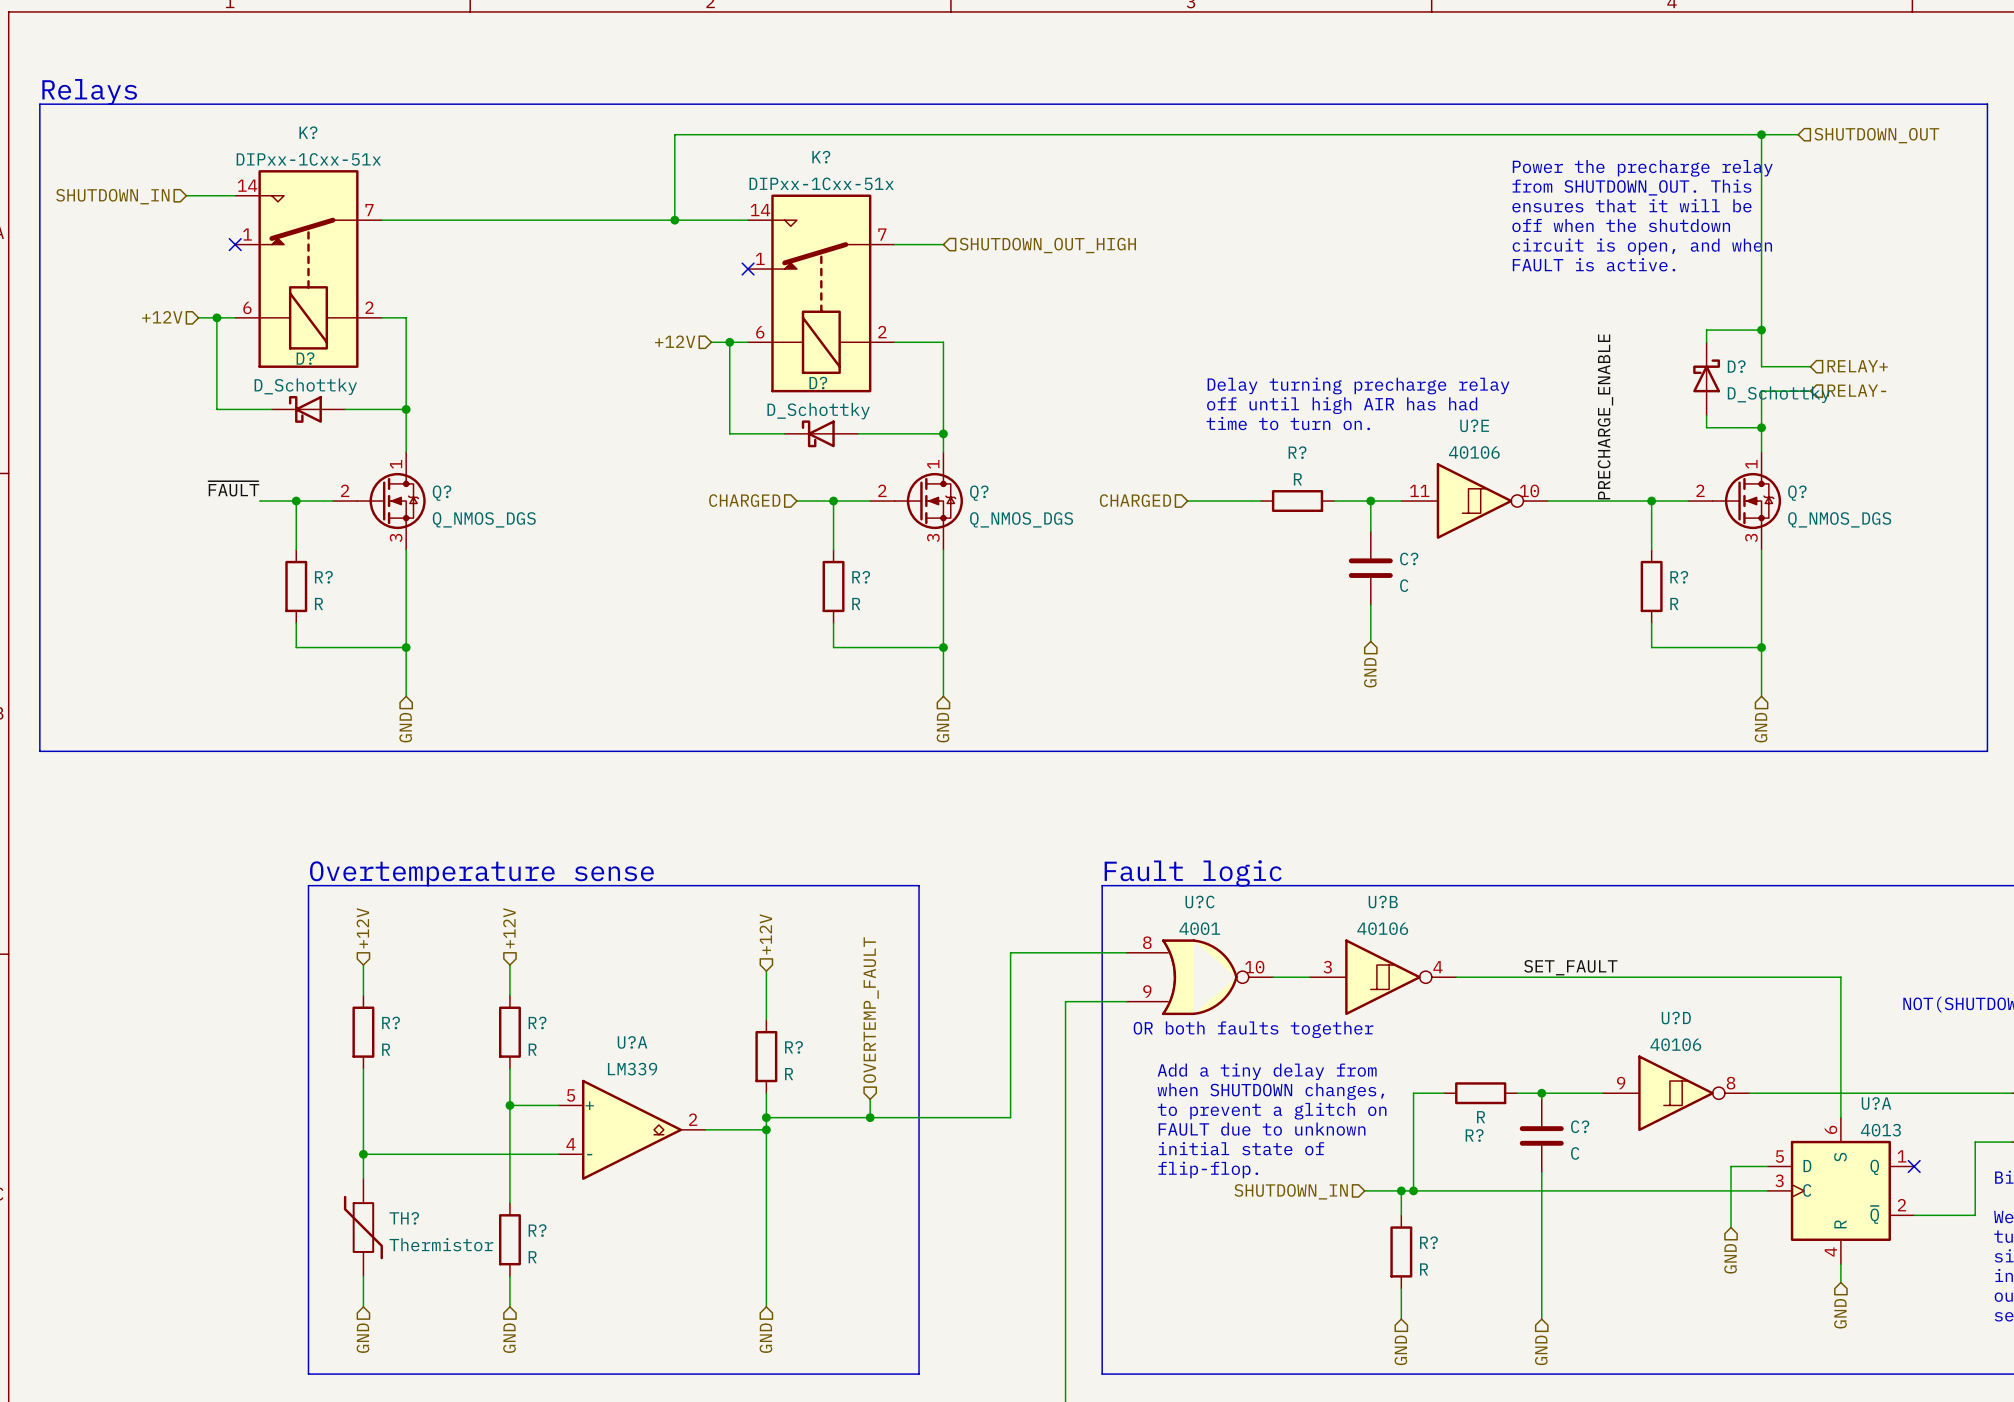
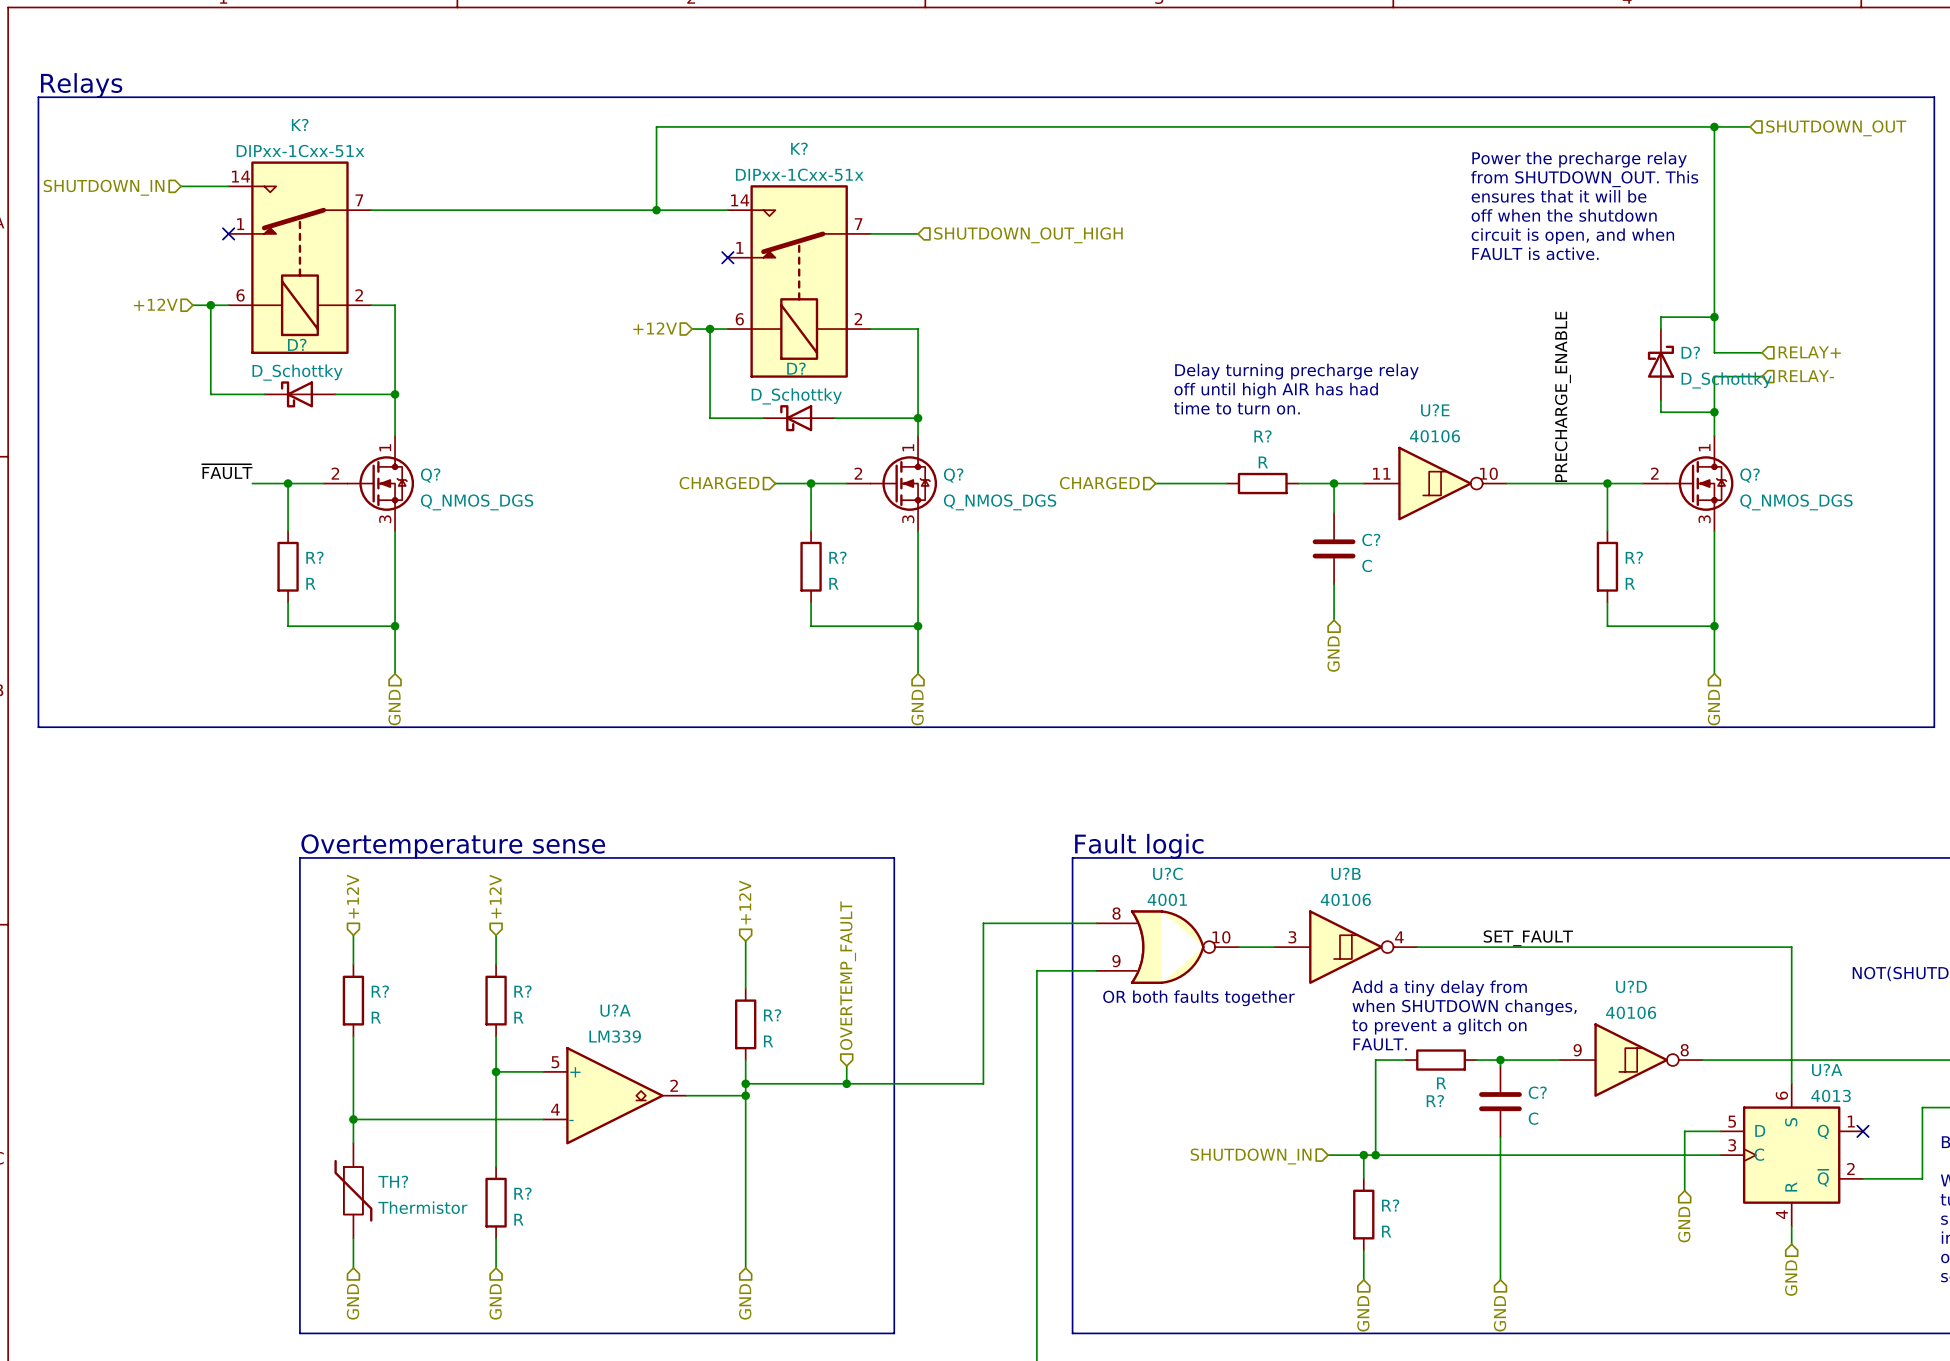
text position: Add a tiny delay from (1267, 1071) -> Add a tiny delay from (1439, 988)
text: none -> FAULT. (1380, 1044)
text position: when SHUTDOWN changes, (1270, 1091) -> when SHUTDOWN changes, (1464, 1007)
text position: to prevent a glitch on (1272, 1111) -> to prevent a glitch on (1439, 1026)
text: FAULT due to unknown (1262, 1129) -> none
text: initial state of (1241, 1148) -> none
text: flip-flop. (1208, 1170) -> none

